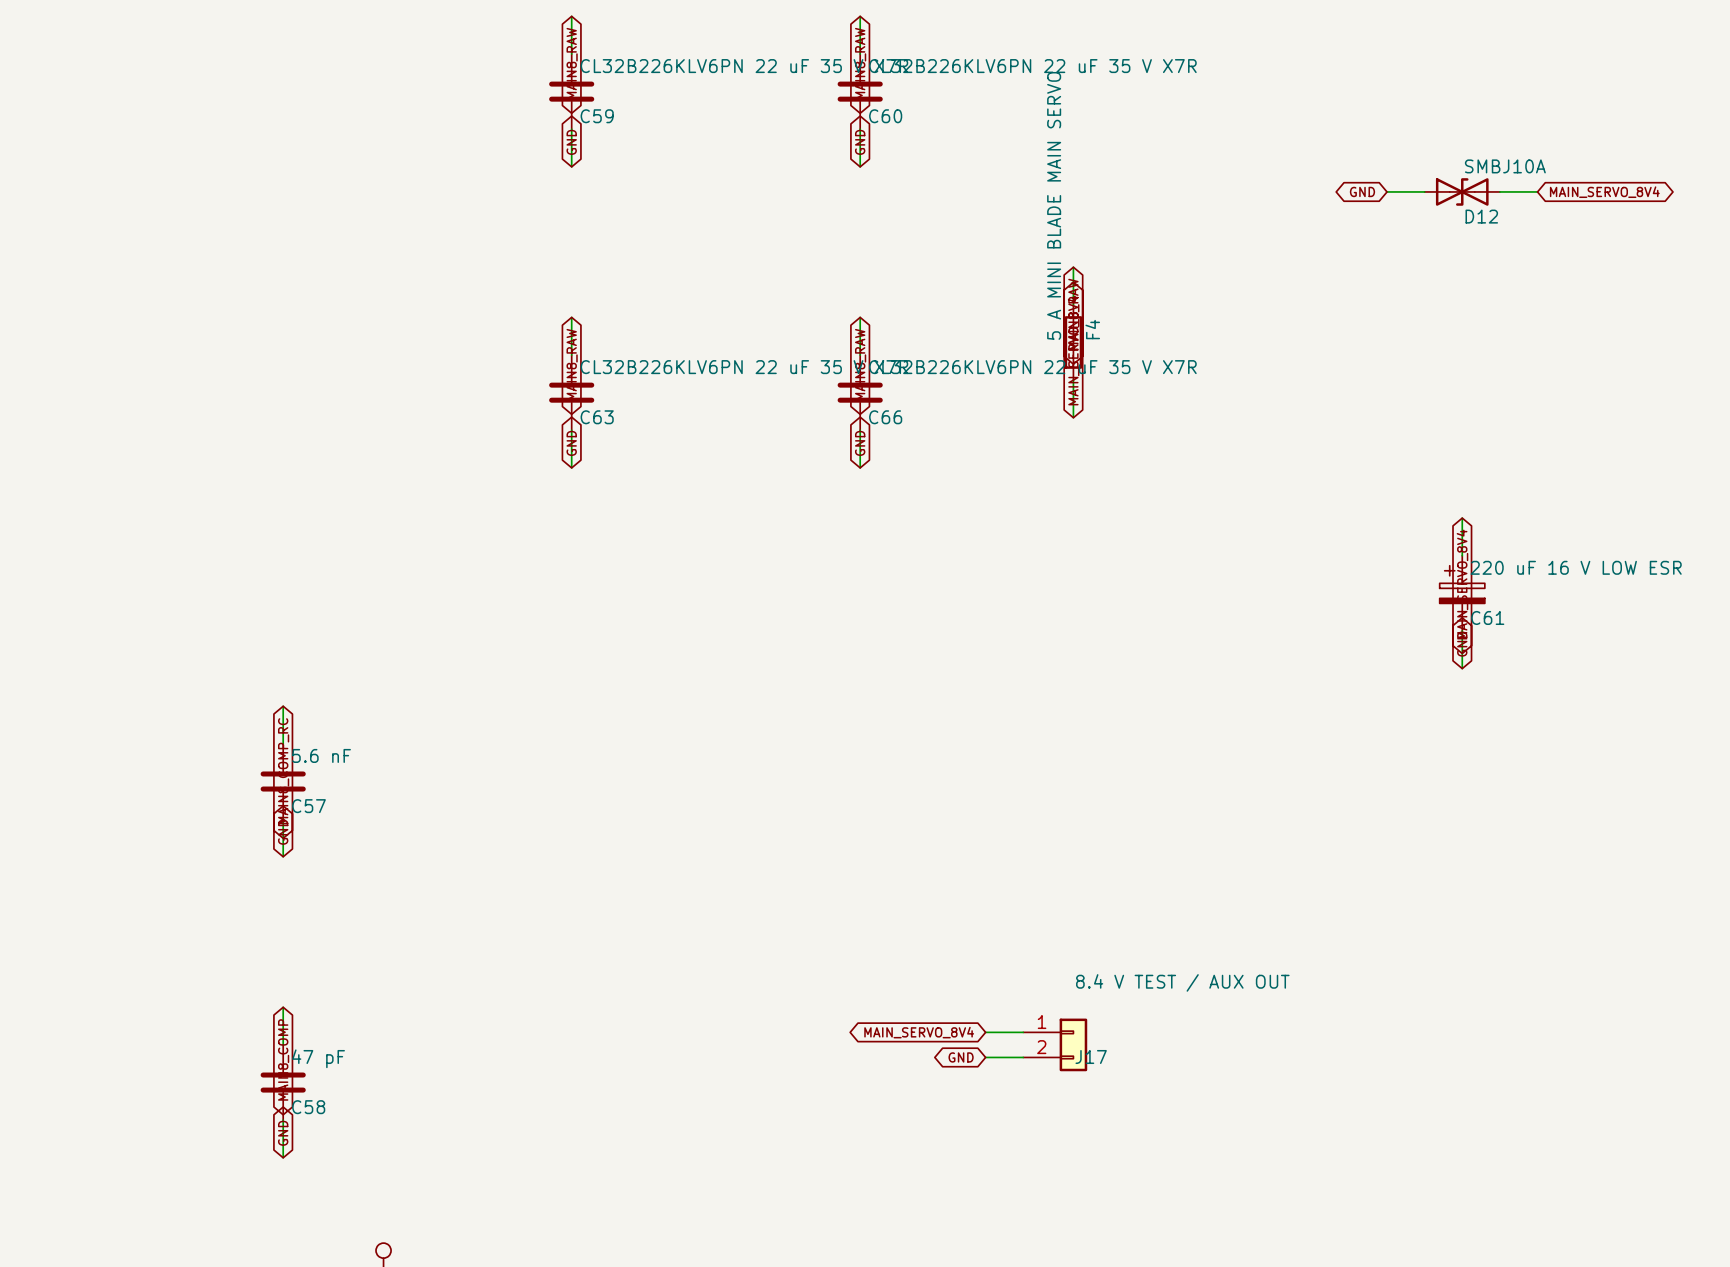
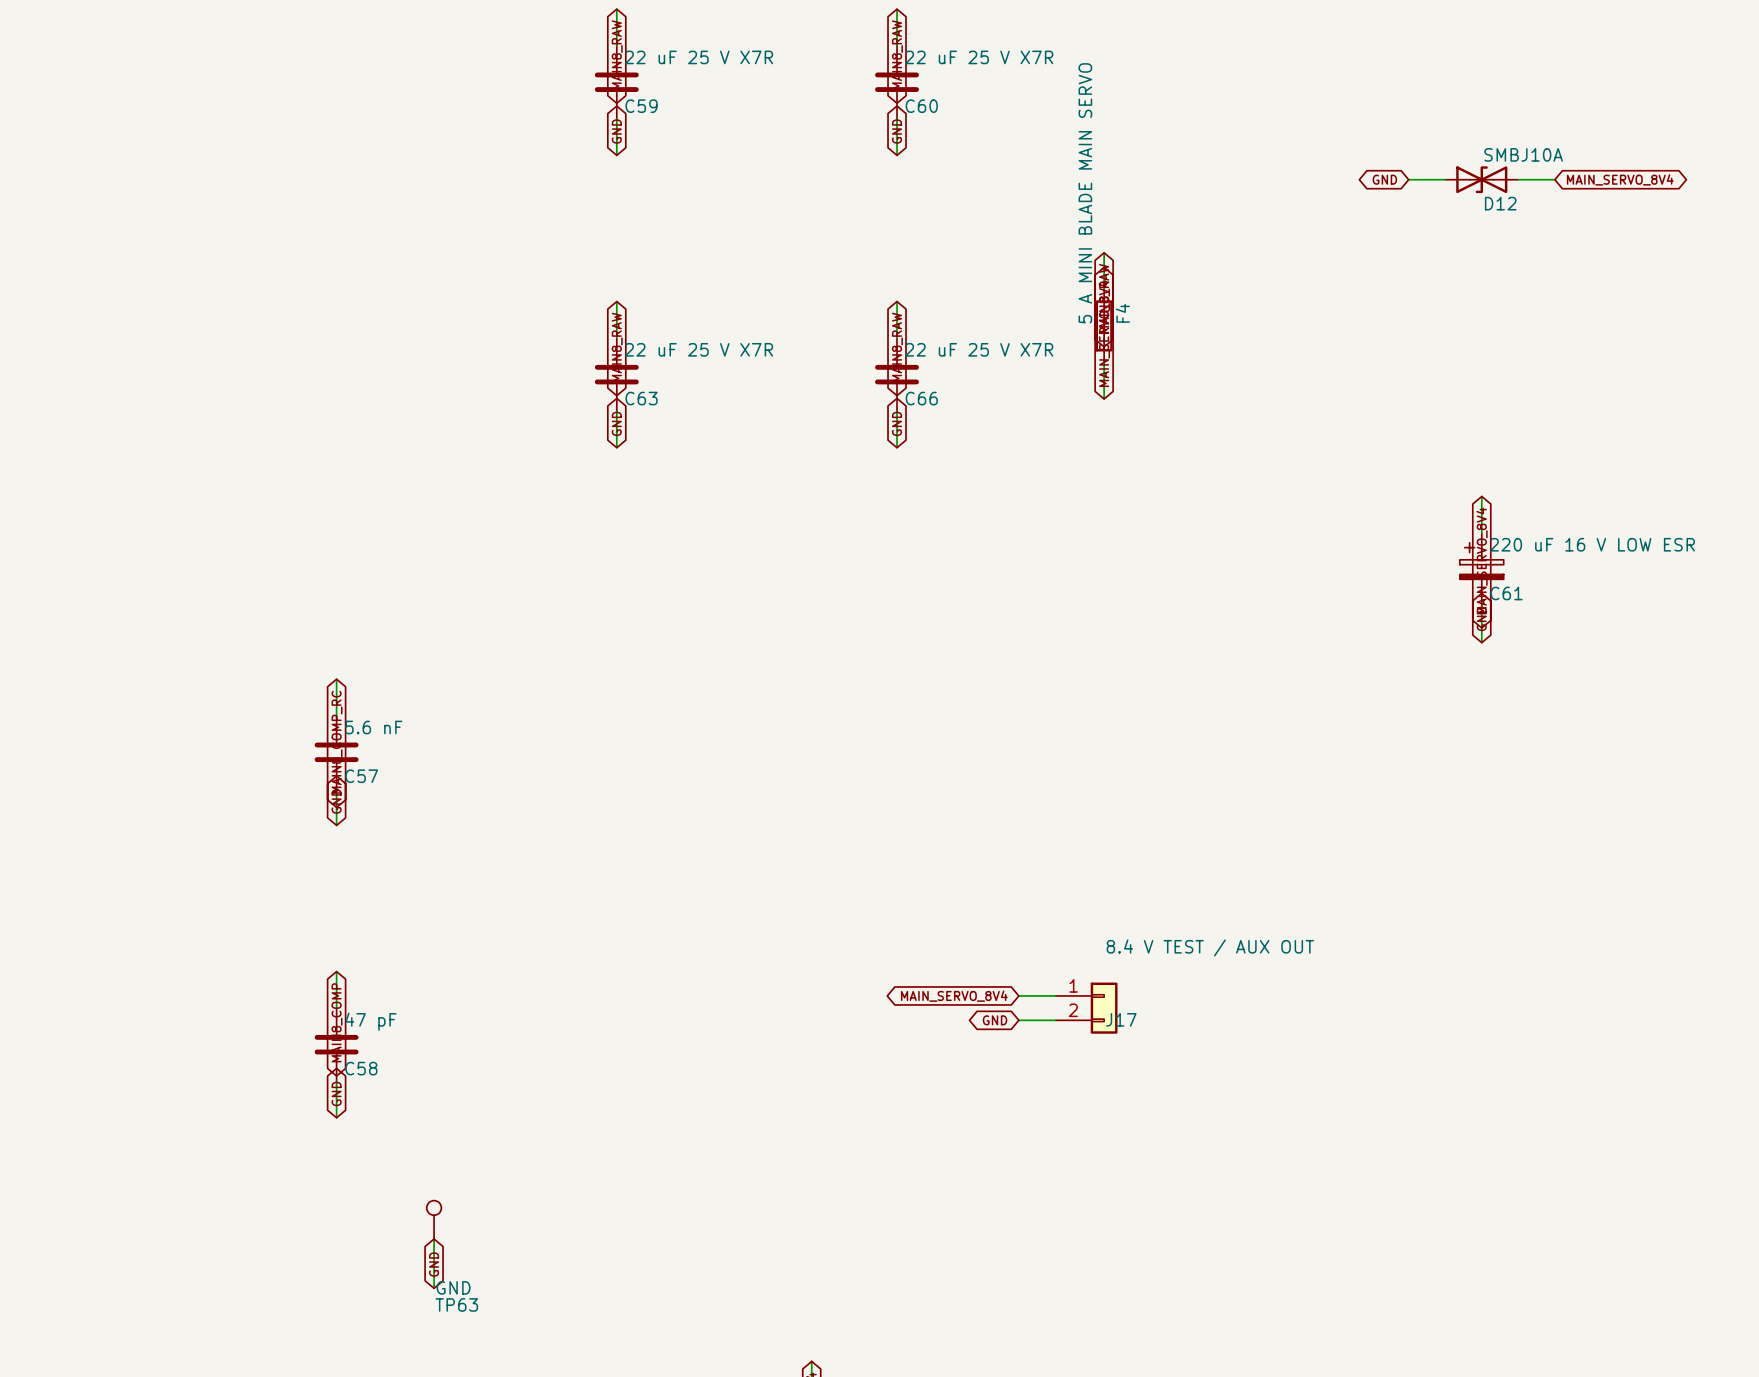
C59 value: CL32B226KLV6PN 22 uF 35 V X7R (744, 66) -> 22 uF 25 V X7R (698, 57)
C60 value: CL32B226KLV6PN 22 uF 35 V X7R (1032, 66) -> 22 uF 25 V X7R (979, 57)
C63 value: CL32B226KLV6PN 22 uF 35 V X7R (744, 367) -> 22 uF 25 V X7R (698, 349)
C66 value: CL32B226KLV6PN 22 uF 35 V X7R (1032, 367) -> 22 uF 25 V X7R (979, 349)

